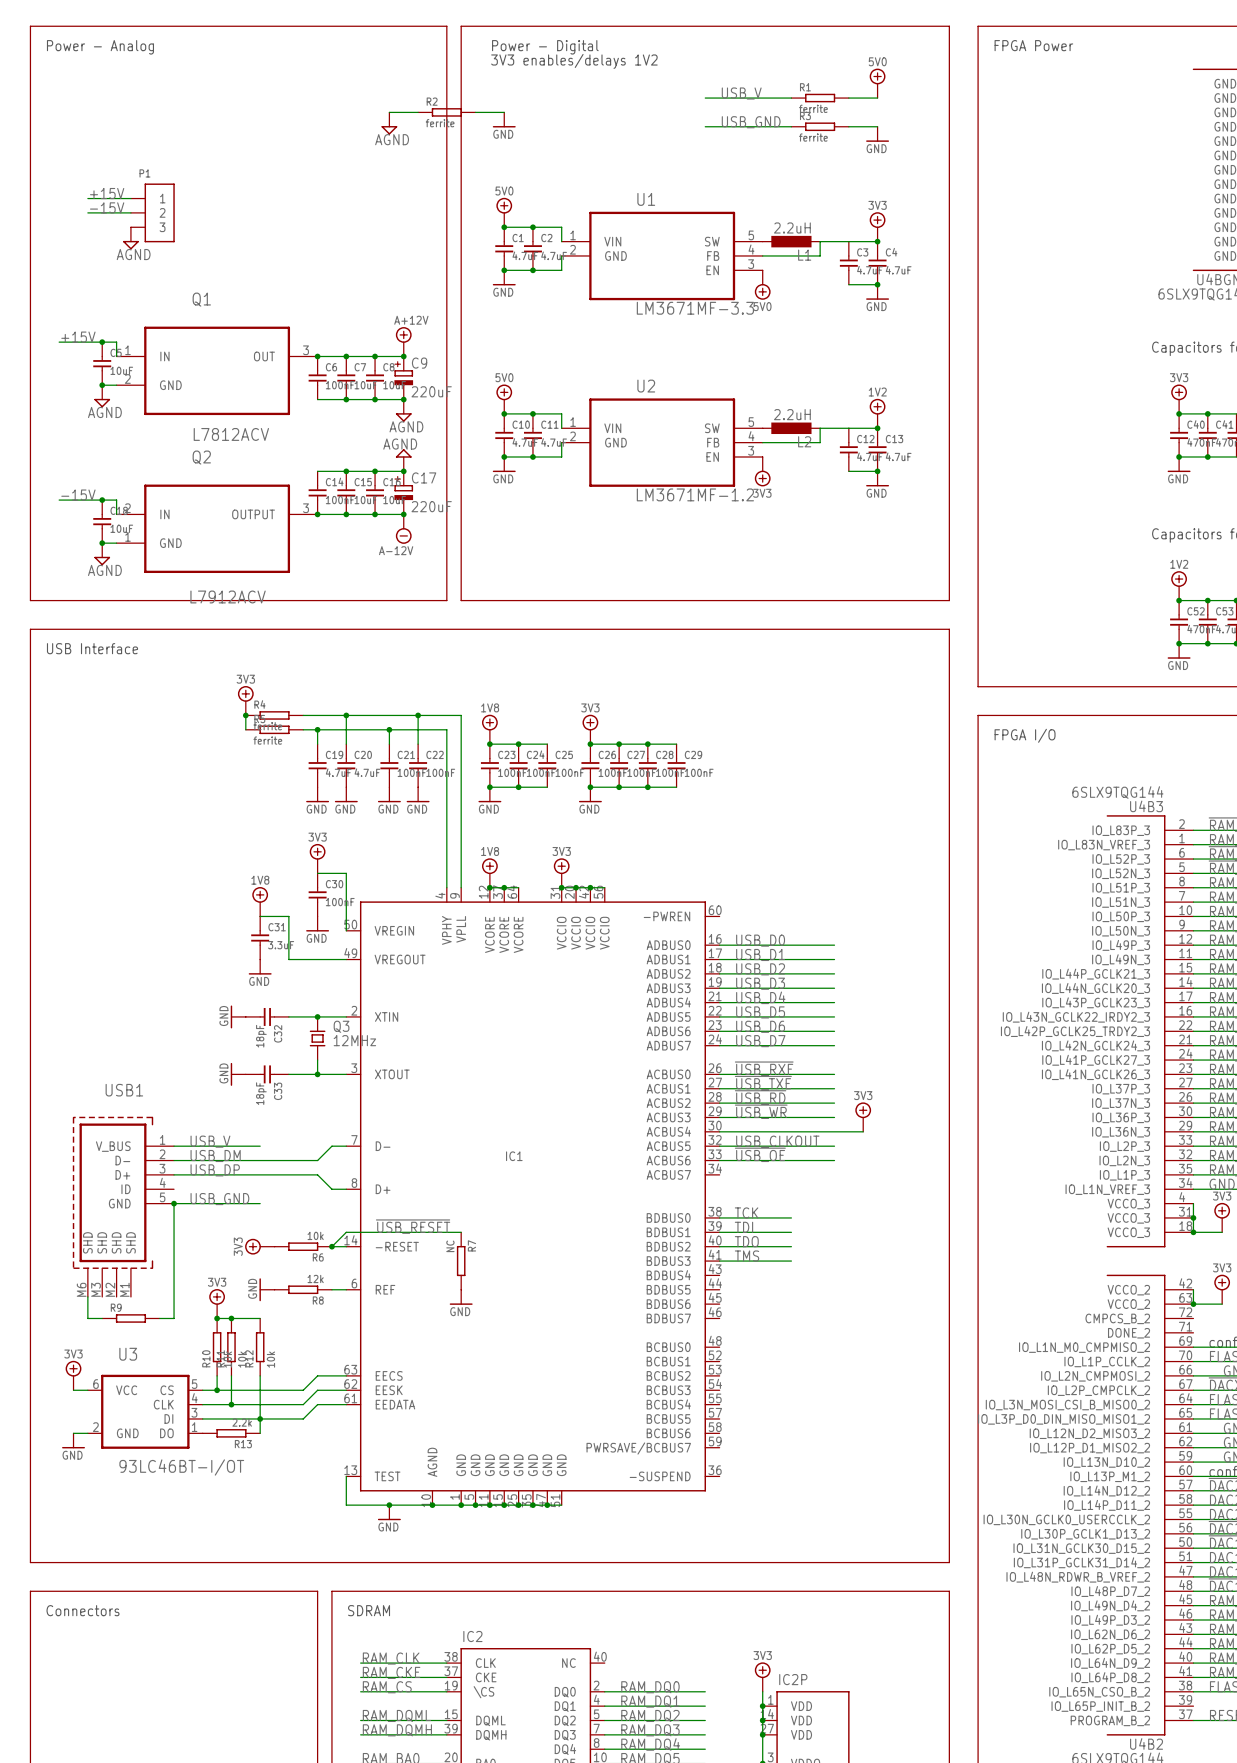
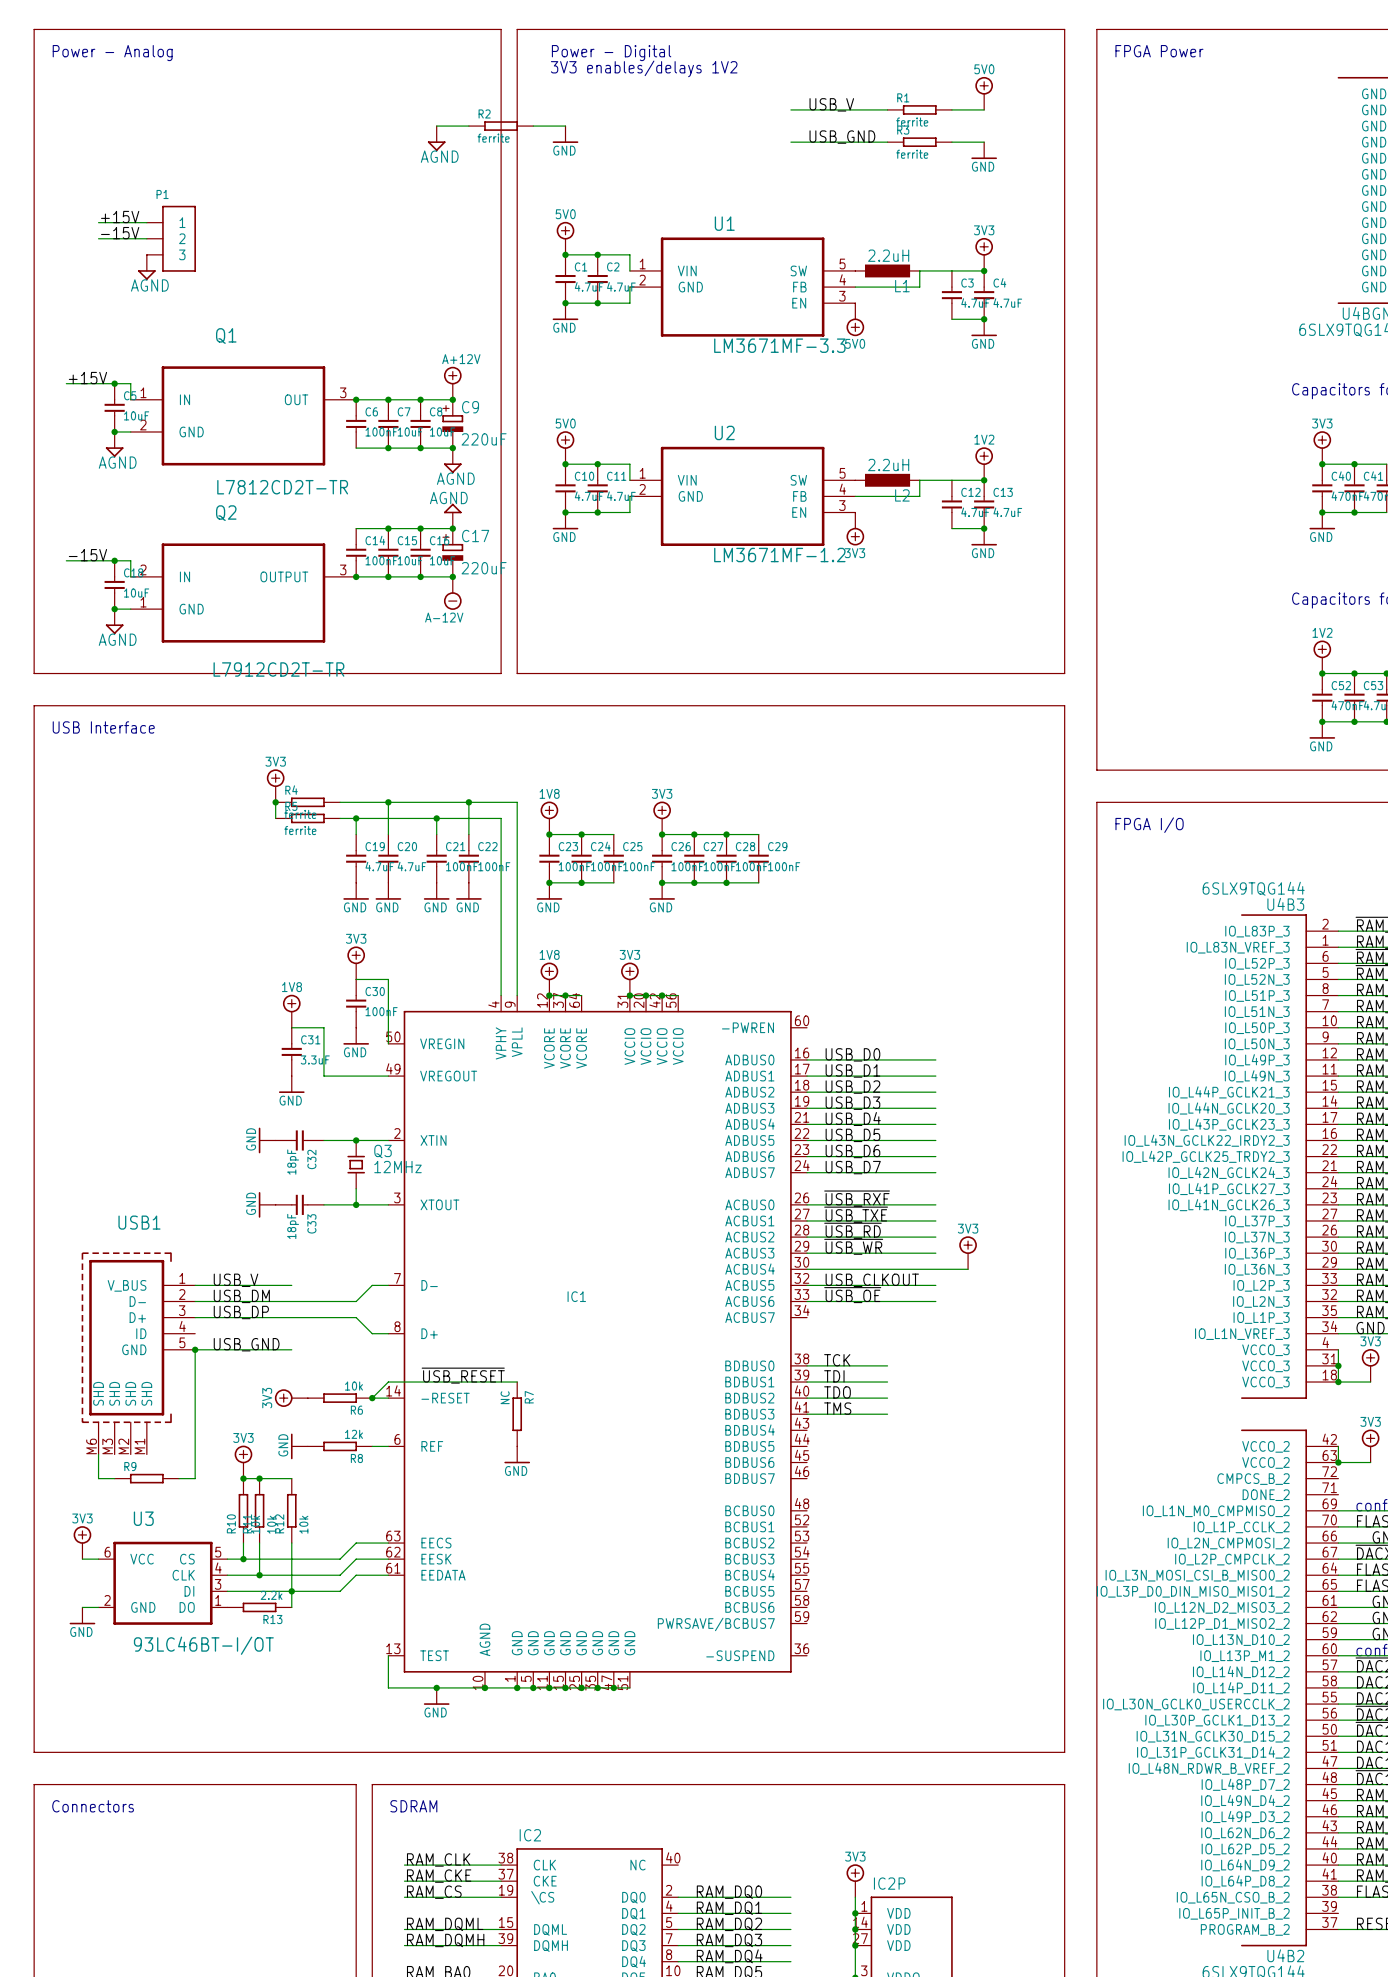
Q1 value: L7812ACV (231, 434) -> L7812CD2T-TR (282, 487)
Q2 value: L7912ACV (228, 596) -> L7912CD2T-TR (278, 669)

